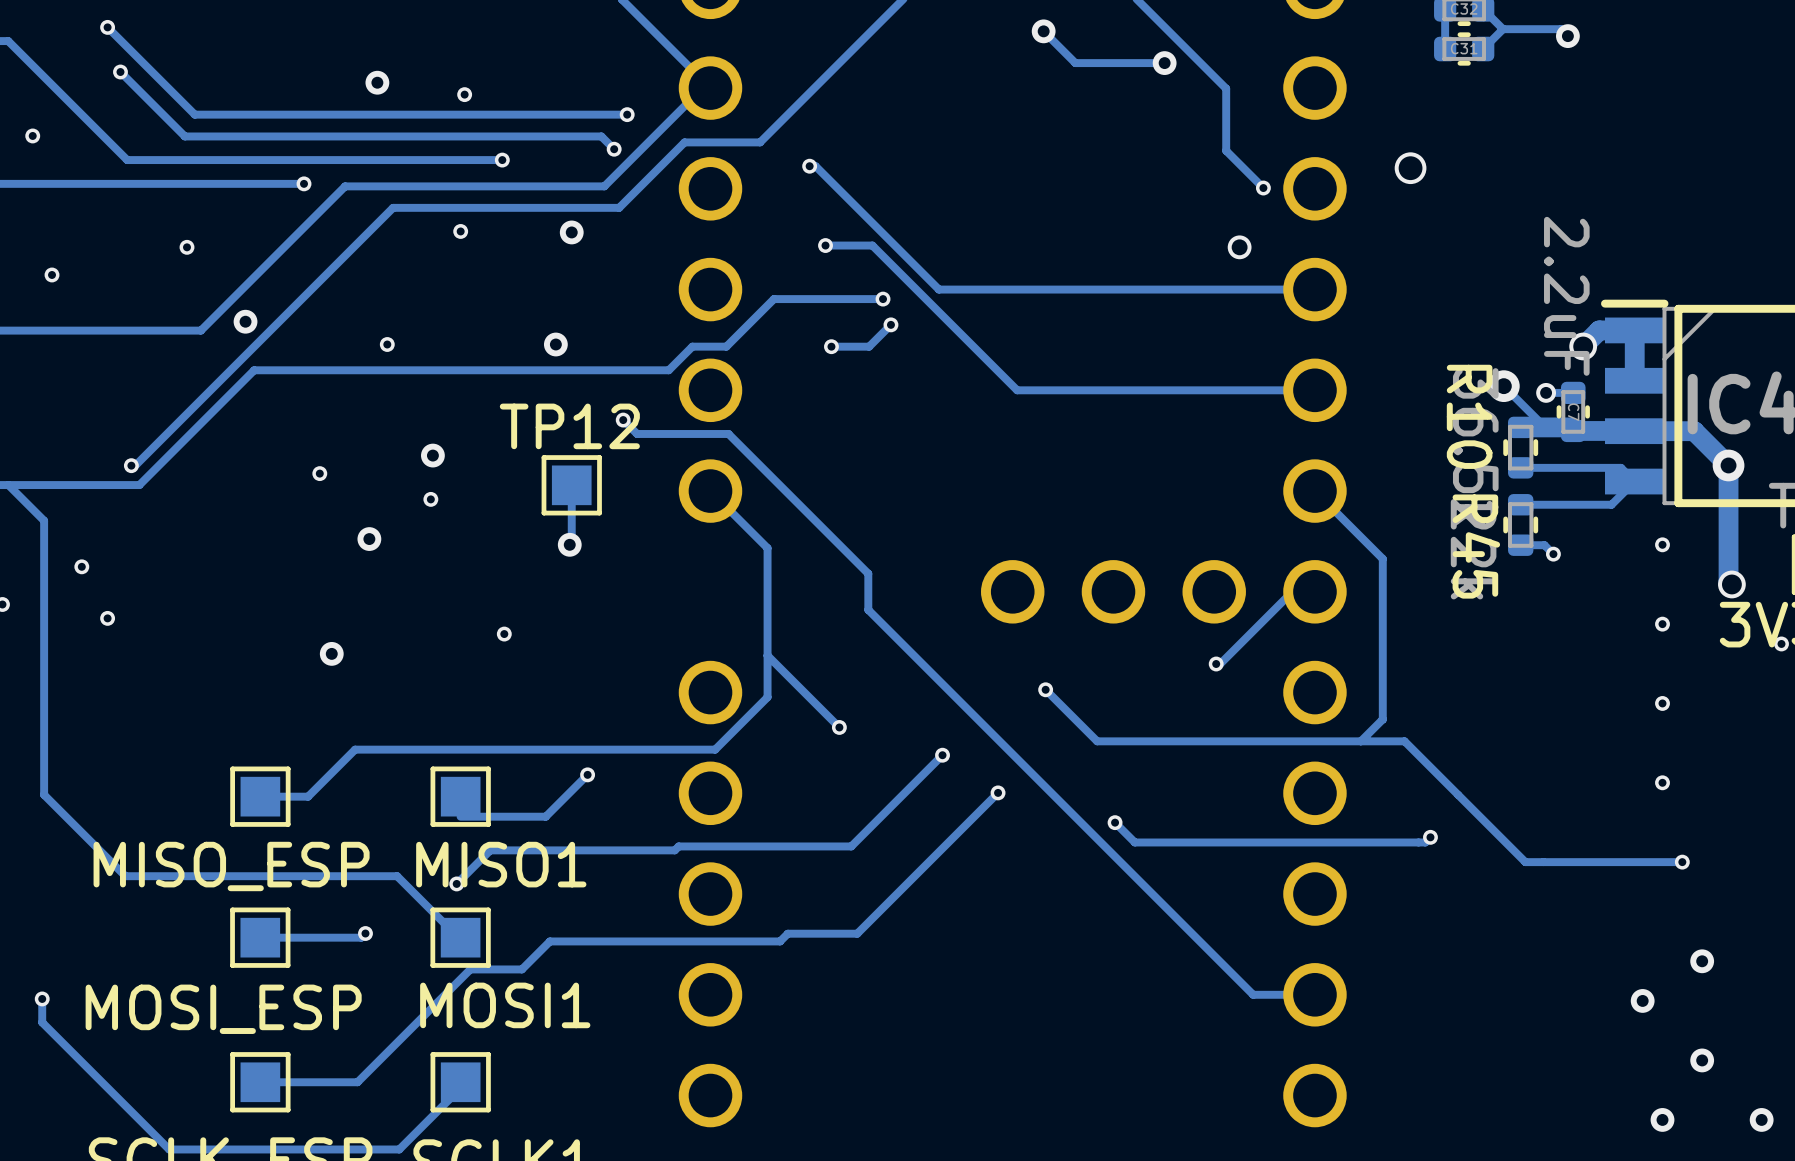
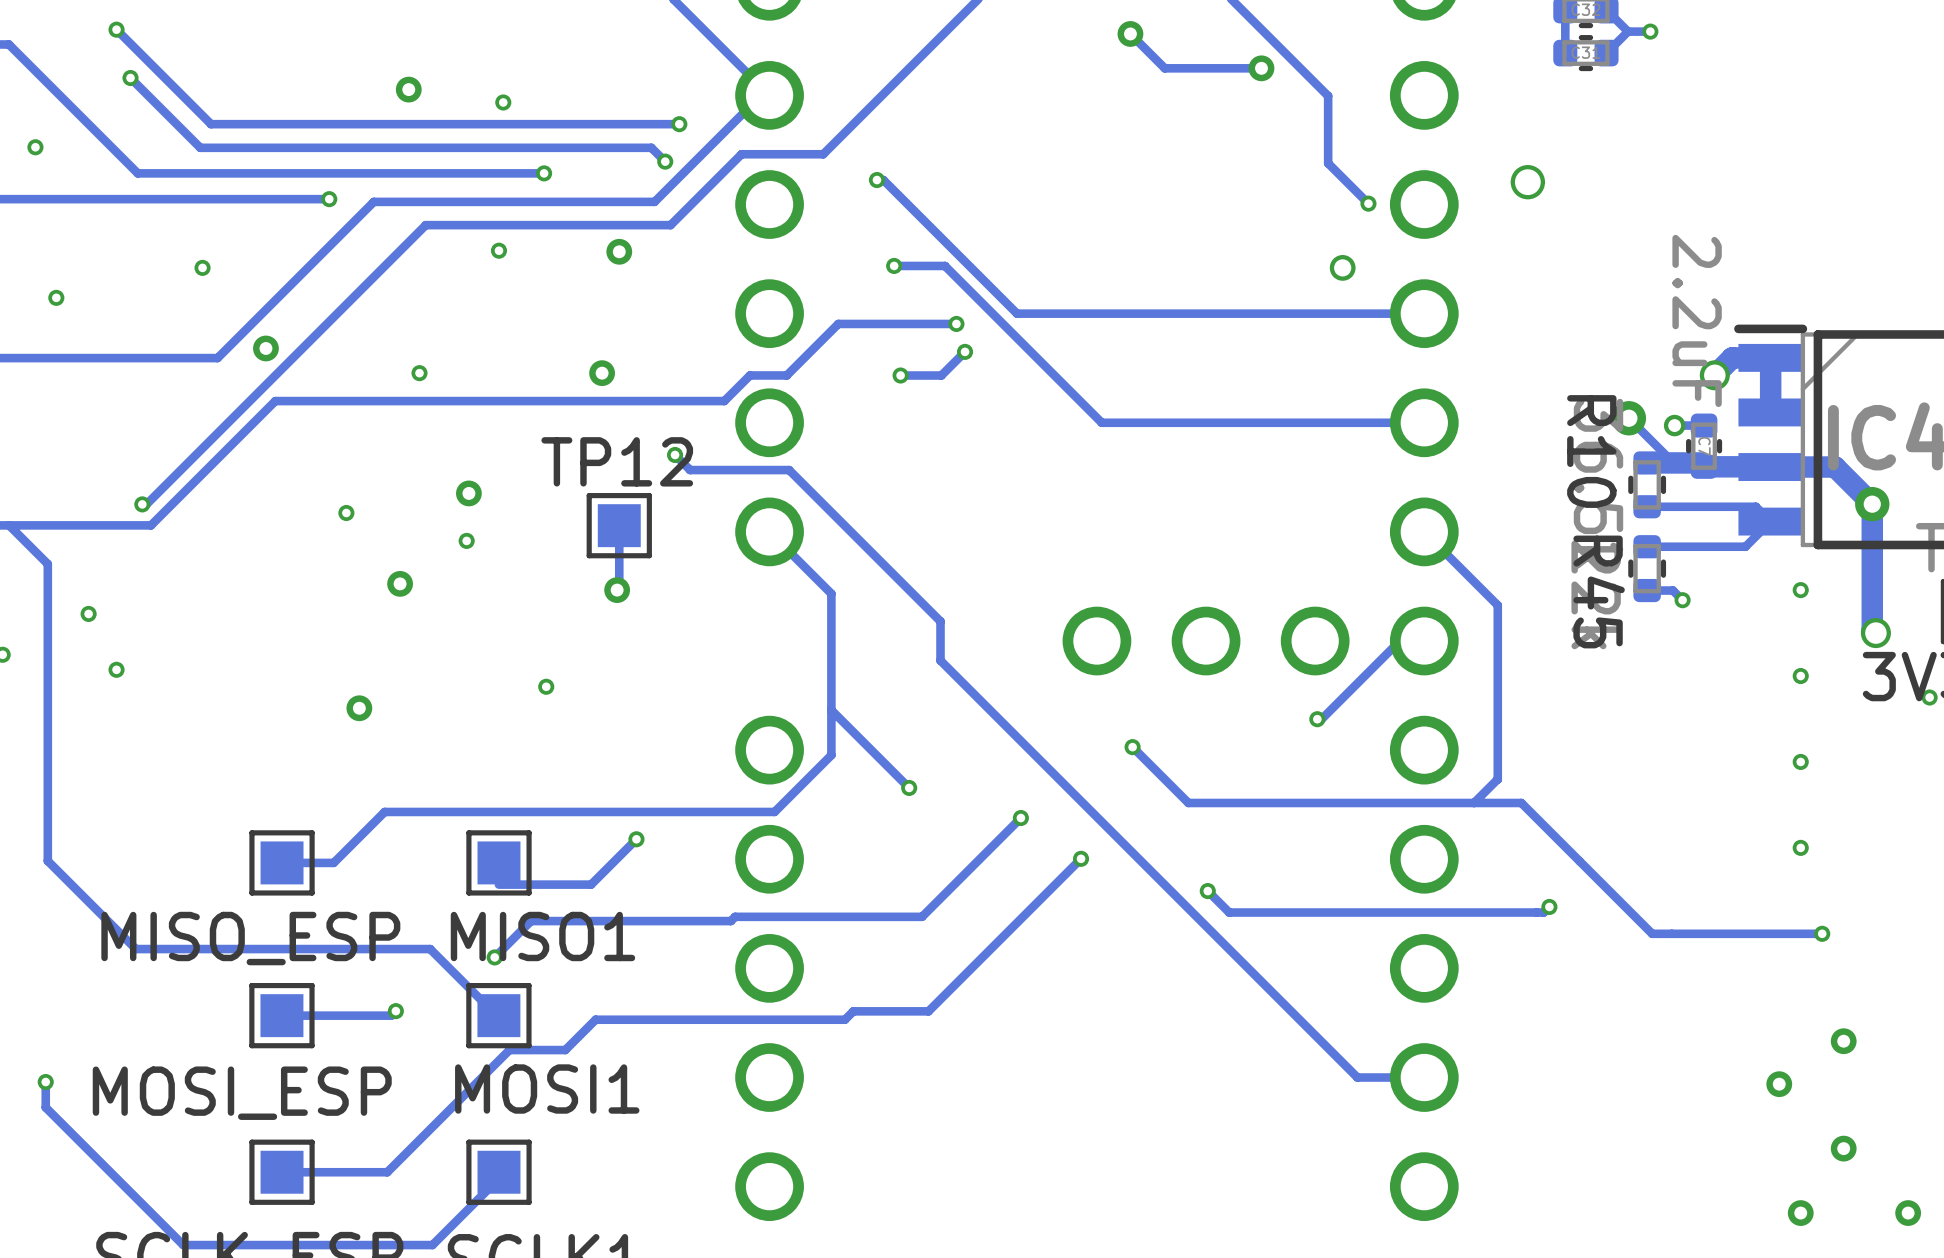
track: (1523, 29) (1560, 29) (1567, 36) -> none
via: none -> (1650, 31)
via: (1567, 36) -> none

